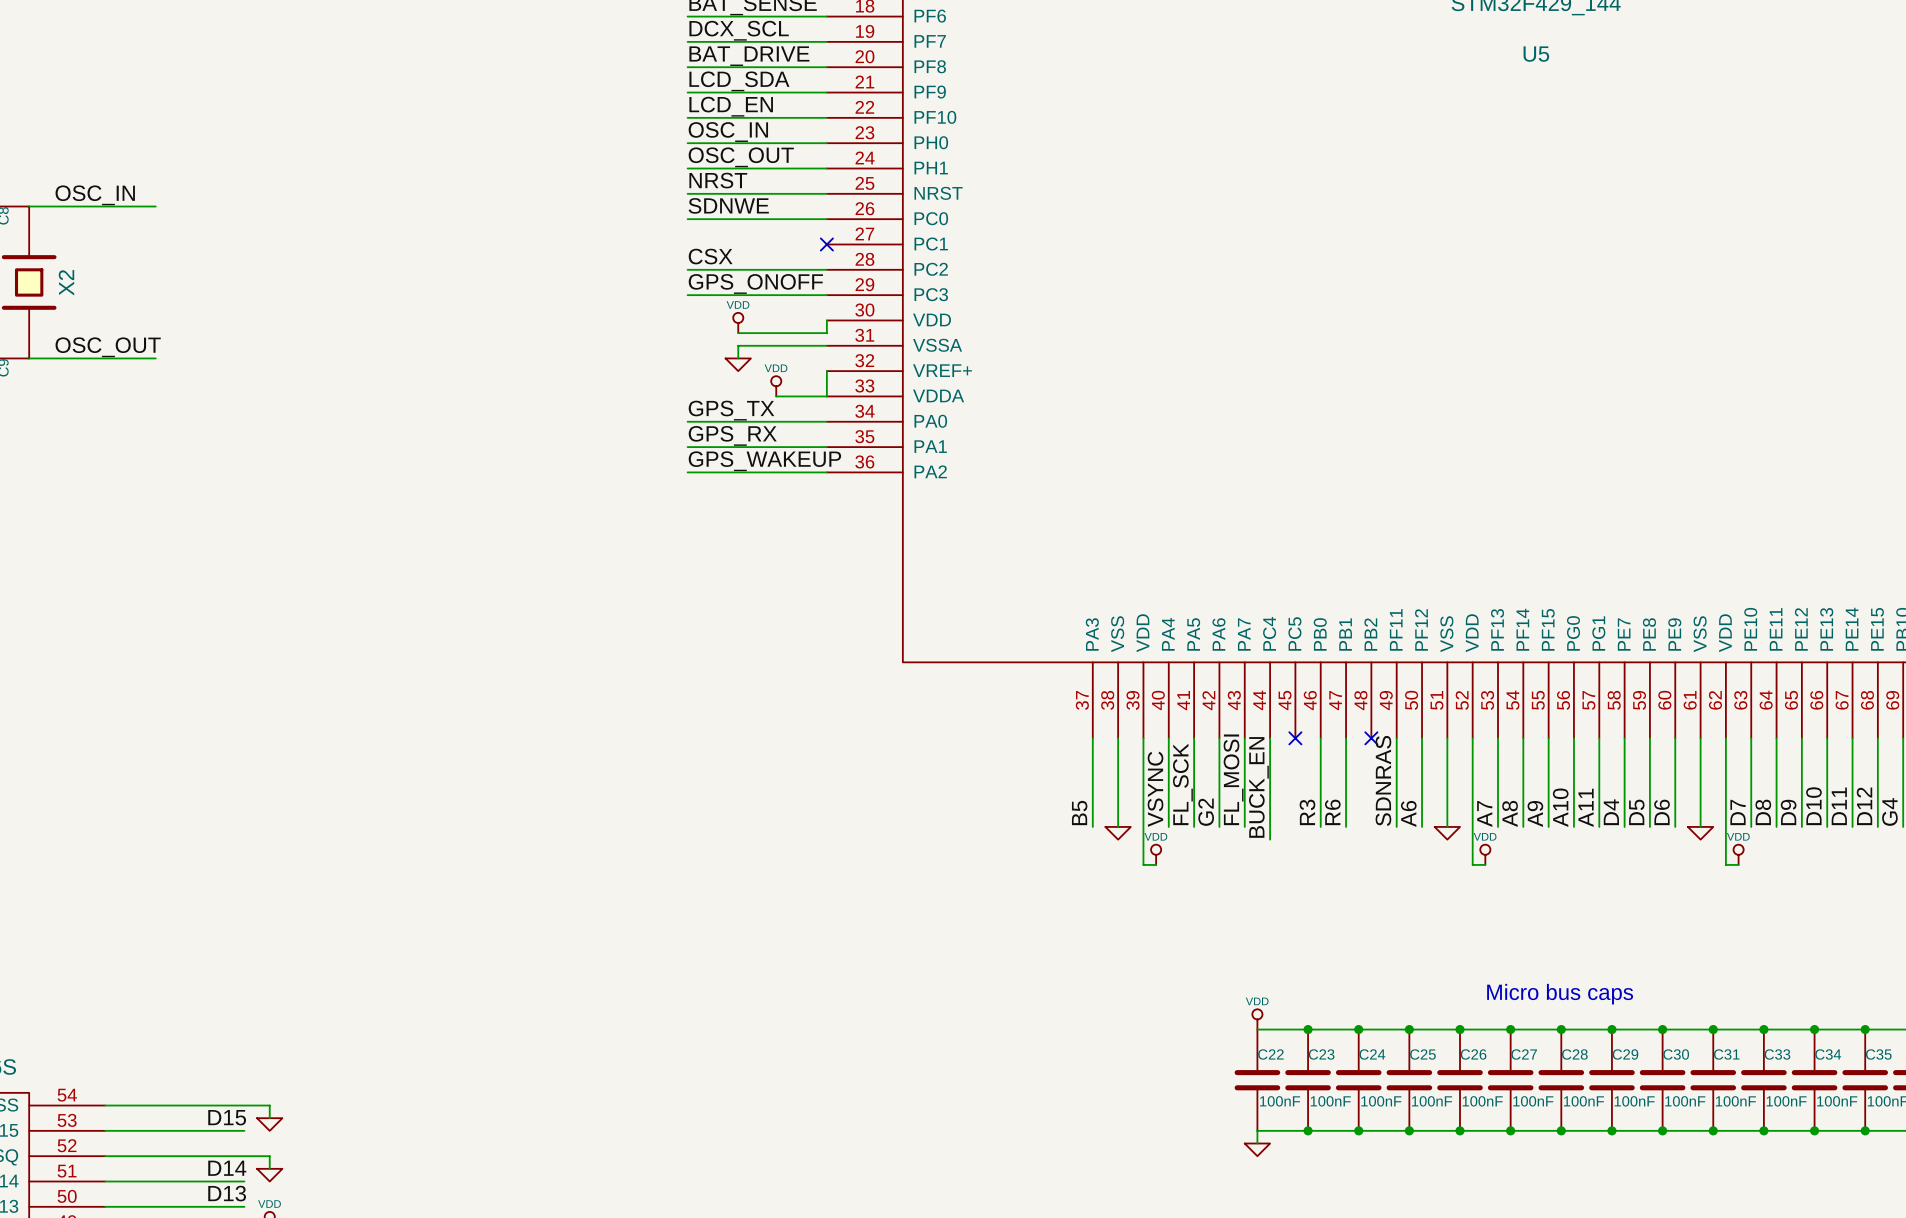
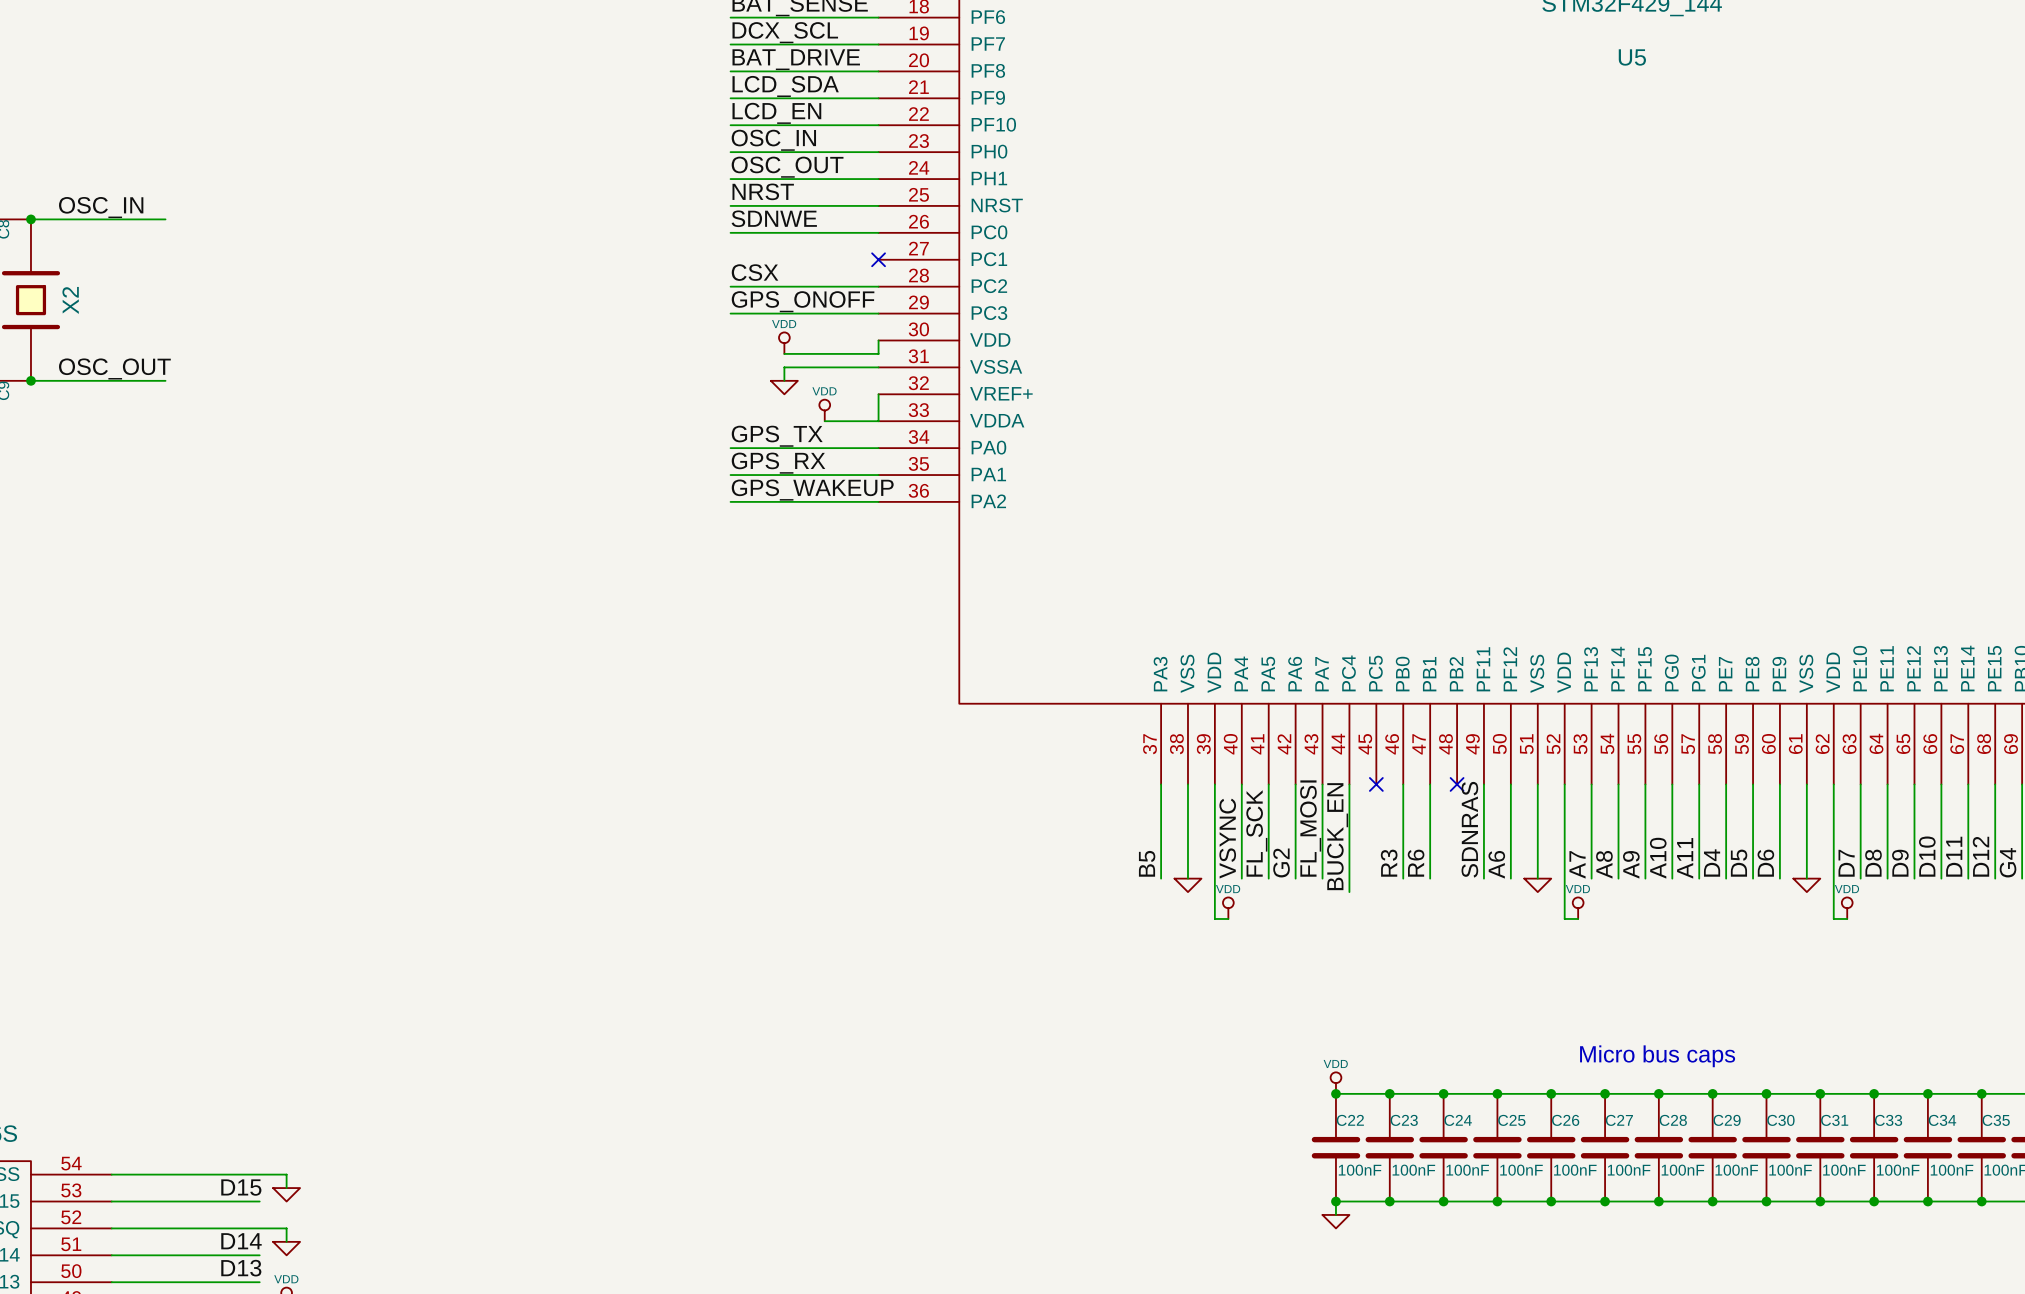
junction: none -> (30, 219)
junction: none -> (30, 380)
junction: none -> (1335, 1093)
junction: none -> (1335, 1201)

